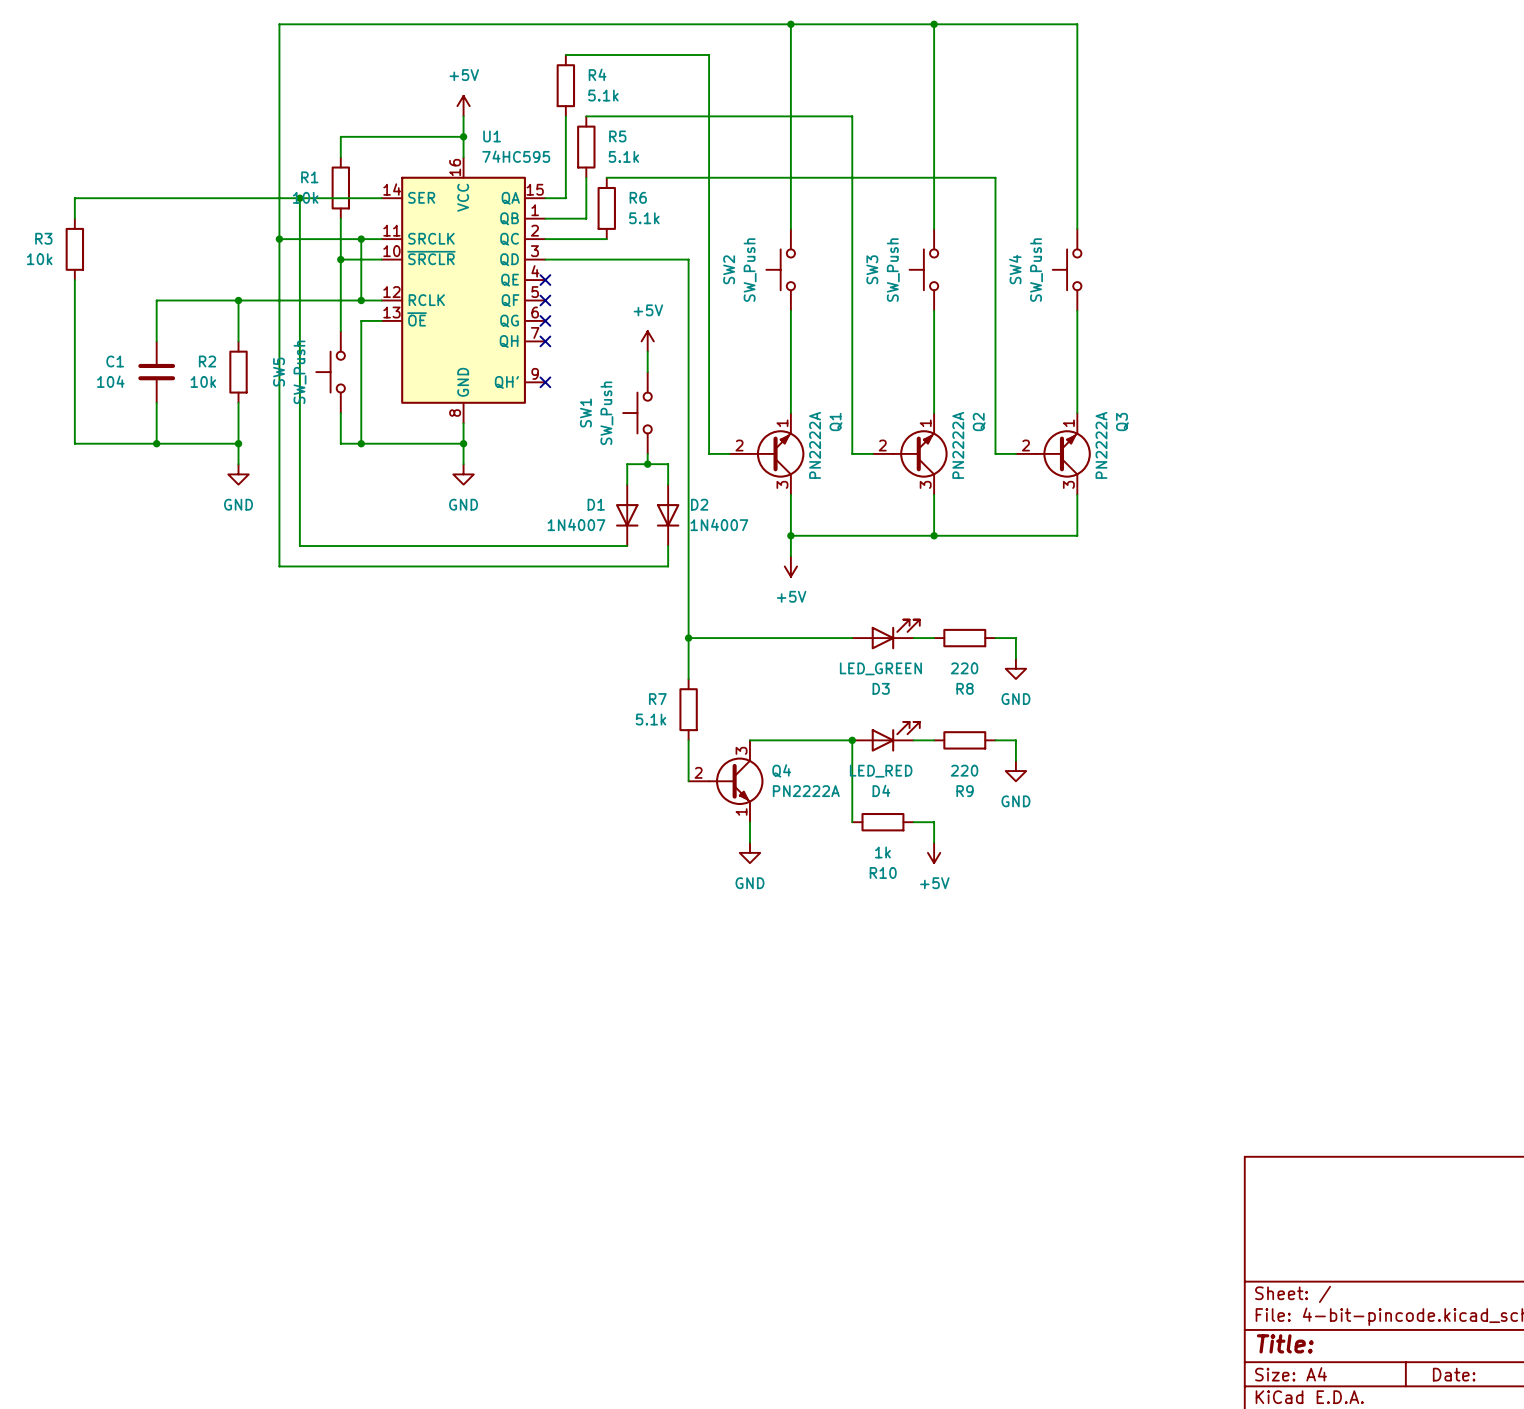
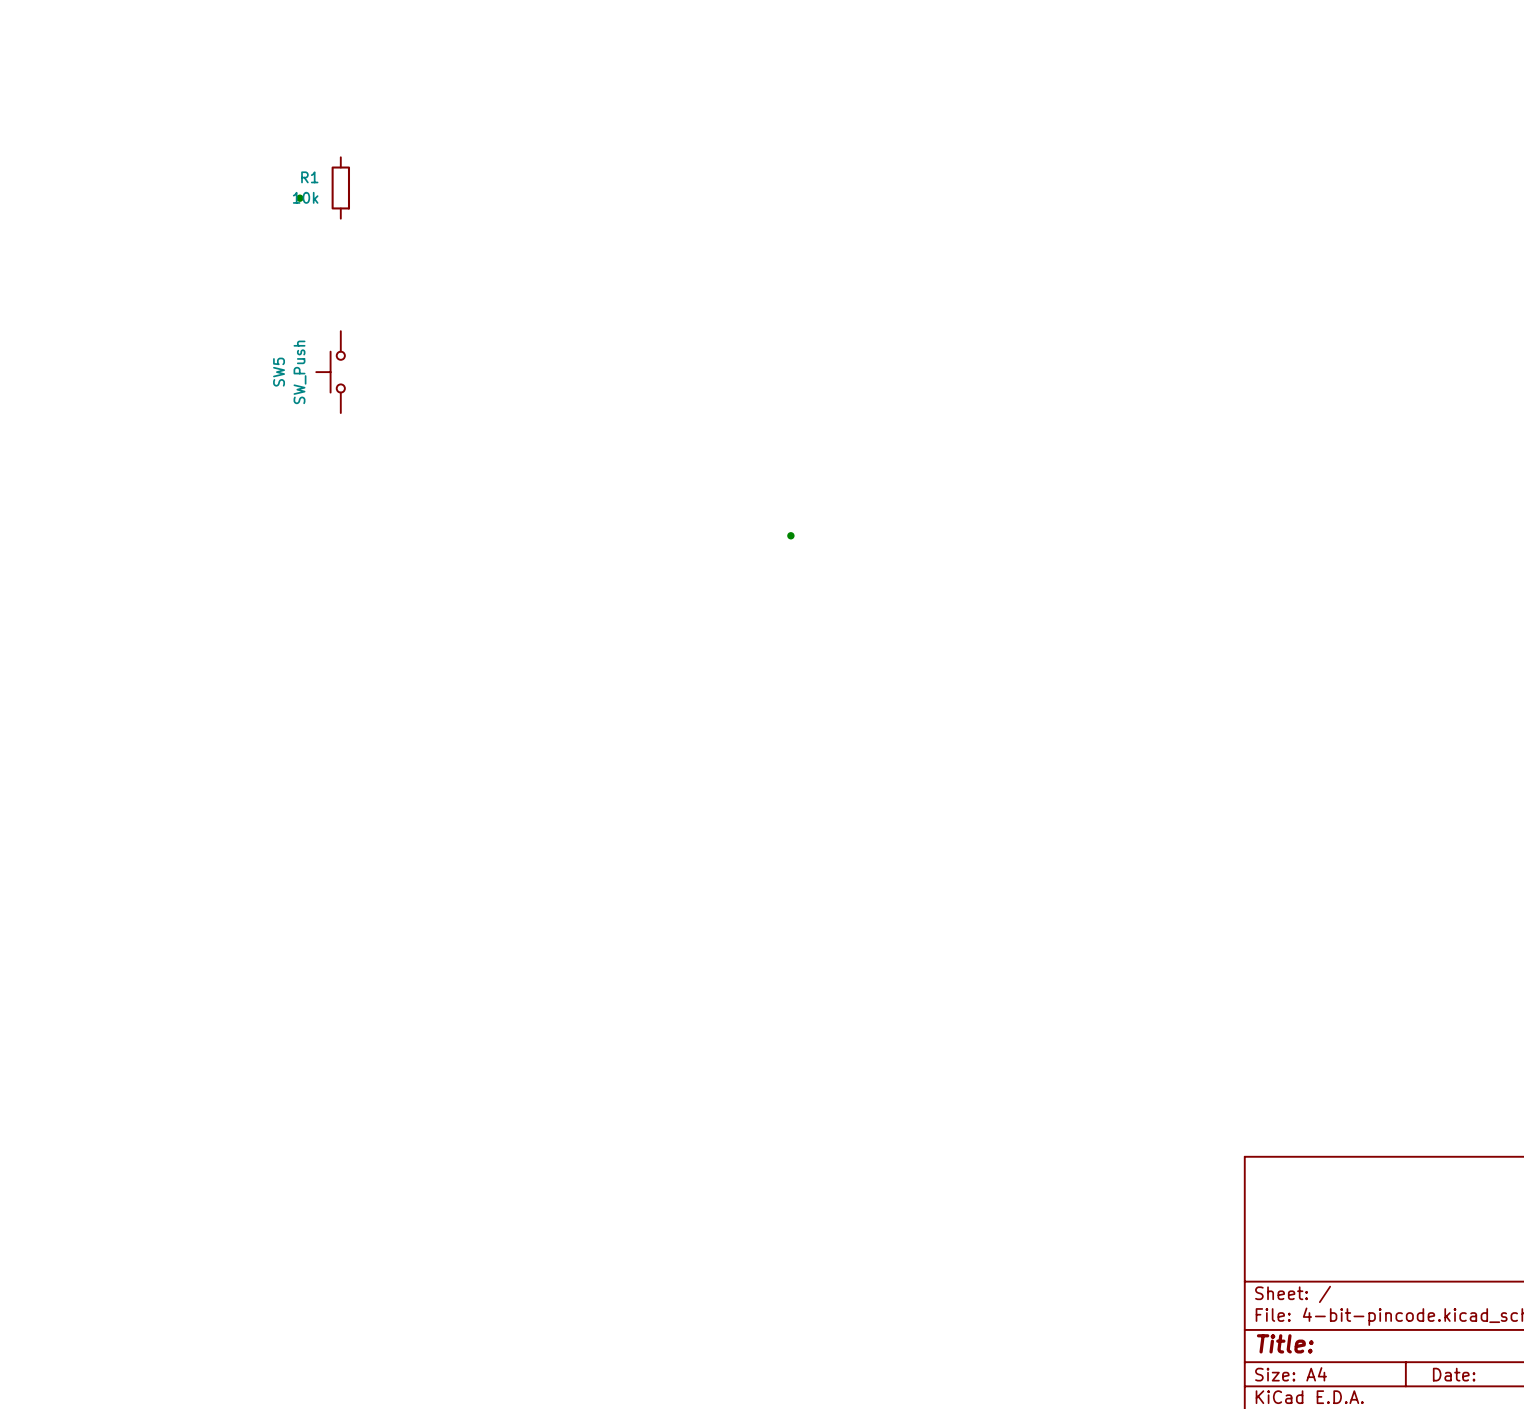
wire: (790, 24) (790, 228) -> none
junction: (790, 24) -> none
wire: (934, 24) (934, 228) -> none
junction: (934, 24) -> none
wire: (565, 55) (709, 55) (709, 453) (729, 453) -> none
R4: 5.1k (565, 85) -> none
power symbol: +5V (463, 106) -> none
wire: (463, 116) (463, 157) -> none
wire: (565, 116) (565, 198) (545, 198) -> none
wire: (586, 116) (852, 116) (852, 453) (872, 453) -> none
wire: (463, 136) (340, 136) (340, 157) -> none
junction: (463, 136) -> none
R5: 5.1k (586, 147) -> none
wire: (586, 177) (586, 218) (545, 218) -> none
wire: (606, 177) (995, 177) (995, 453) (1015, 453) -> none
wire: (299, 198) (299, 546) (627, 546) -> none
wire: (381, 198) (74, 198) (74, 218) -> none
R6: 5.1k (606, 208) -> none
wire: (340, 218) (340, 331) -> none
wire: (1077, 228) (1077, 24) (279, 24) (279, 566) (668, 566) (668, 546) -> none
wire: (279, 239) (381, 239) -> none
junction: (279, 239) -> none
wire: (361, 239) (361, 300) -> none
junction: (361, 239) -> none
wire: (545, 239) (606, 239) -> none
R3: 10k (74, 249) -> none
wire: (340, 259) (381, 259) -> none
junction: (340, 259) -> none
wire: (545, 259) (688, 259) (688, 678) -> none
SW2: SW_Push (780, 269) -> none
SW3: SW_Push (923, 269) -> none
SW4: SW_Push (1067, 269) -> none
wire: (74, 280) (74, 443) (238, 443) -> none
no-connect mark: (545, 280) -> none
U1: 74HC595 (463, 290) -> none
wire: (238, 300) (238, 341) -> none
junction: (238, 300) -> none
junction: (361, 300) -> none
wire: (381, 300) (156, 300) (156, 341) -> none
no-connect mark: (545, 300) -> none
wire: (790, 310) (790, 413) -> none
wire: (934, 310) (934, 413) -> none
wire: (1077, 310) (1077, 413) -> none
wire: (381, 320) (361, 320) (361, 443) -> none
no-connect mark: (545, 320) -> none
no-connect mark: (545, 341) -> none
power symbol: +5V (647, 341) -> none
wire: (647, 351) (647, 372) -> none
C1: 104 (156, 372) -> none
R2: 10k (238, 372) -> none
no-connect mark: (545, 382) -> none
wire: (156, 402) (156, 443) -> none
wire: (238, 402) (238, 464) -> none
wire: (340, 413) (340, 443) (463, 443) -> none
SW1: SW_Push (637, 413) -> none
wire: (463, 423) (463, 464) -> none
junction: (156, 443) -> none
junction: (238, 443) -> none
junction: (361, 443) -> none
junction: (463, 443) -> none
wire: (647, 453) (647, 464) -> none
Q1: PN2222A (766, 453) -> none
Q2: PN2222A (910, 453) -> none
Q3: PN2222A (1053, 453) -> none
junction: (647, 464) -> none
power symbol: GND (238, 474) -> none
power symbol: GND (463, 474) -> none
wire: (627, 484) (627, 464) (668, 464) (668, 484) -> none
wire: (790, 494) (790, 556) -> none
wire: (934, 494) (934, 535) -> none
wire: (1077, 494) (1077, 535) (790, 535) -> none
D1: 1N4007 (627, 515) -> none
D2: 1N4007 (668, 515) -> none
junction: (934, 535) -> none
power symbol: +5V (790, 566) -> none
D3: LED_GREEN (886, 634) -> none
wire: (688, 638) (852, 638) -> none
junction: (688, 638) -> none
wire: (913, 638) (934, 638) -> none
R8: 220 (964, 638) -> none
wire: (995, 638) (1015, 638) (1015, 658) -> none
power symbol: GND (1015, 668) -> none
R7: 5.1k (688, 709) -> none
D4: LED_RED (886, 736) -> none
wire: (688, 740) (688, 781) -> none
wire: (749, 740) (852, 740) (852, 822) -> none
junction: (852, 740) -> none
wire: (913, 740) (934, 740) -> none
R9: 220 (964, 740) -> none
wire: (995, 740) (1015, 740) (1015, 760) -> none
power symbol: GND (1015, 771) -> none
Q4: PN2222A (726, 781) -> none
wire: (749, 822) (749, 842) -> none
R10: 1k (882, 822) -> none
wire: (913, 822) (934, 822) (934, 842) -> none
power symbol: GND (749, 852) -> none
power symbol: +5V (934, 852) -> none

